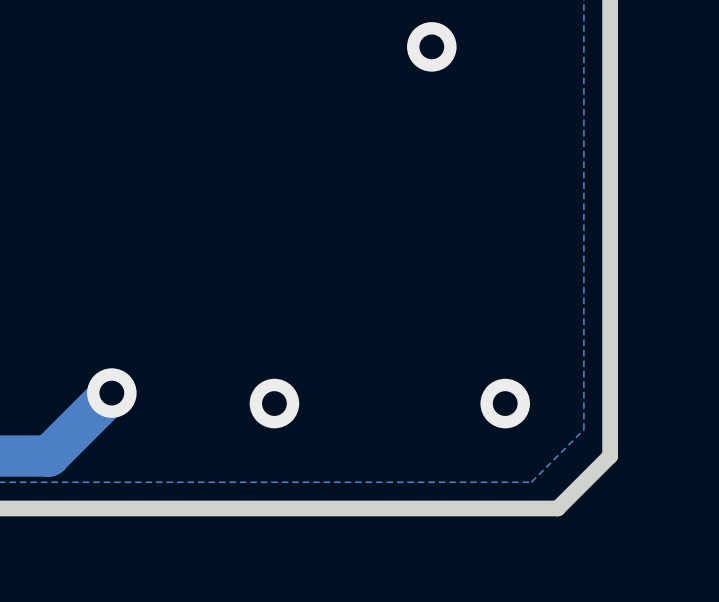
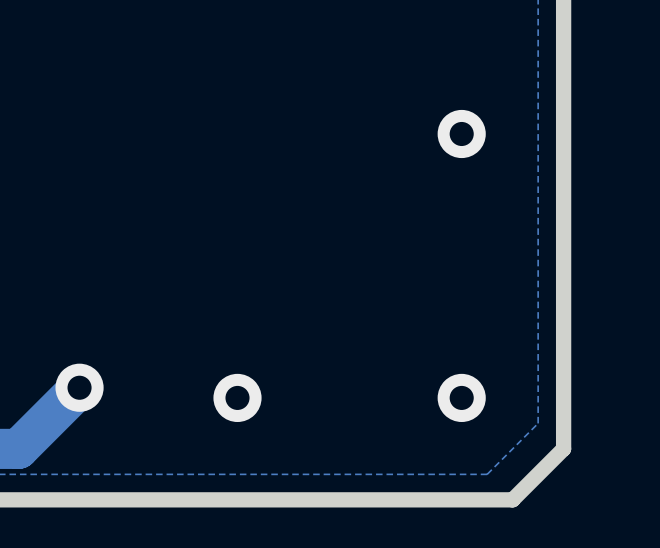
via position: (431, 46) -> (461, 133)

